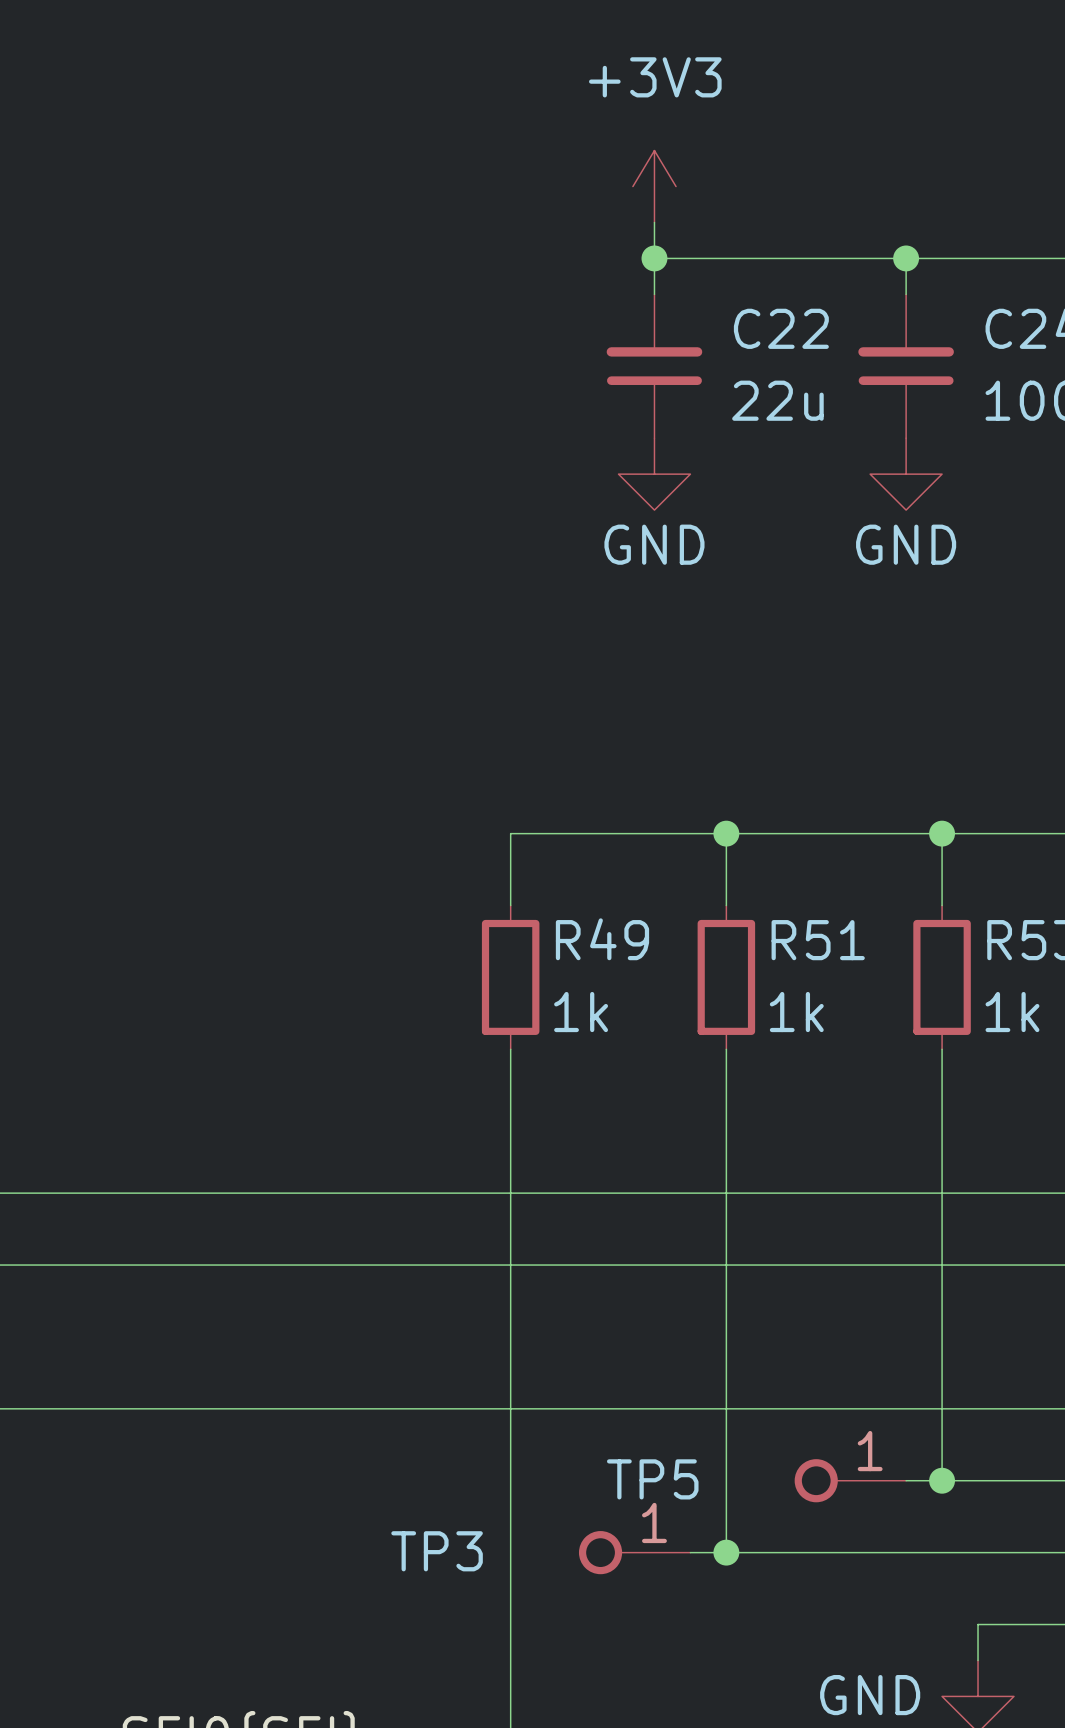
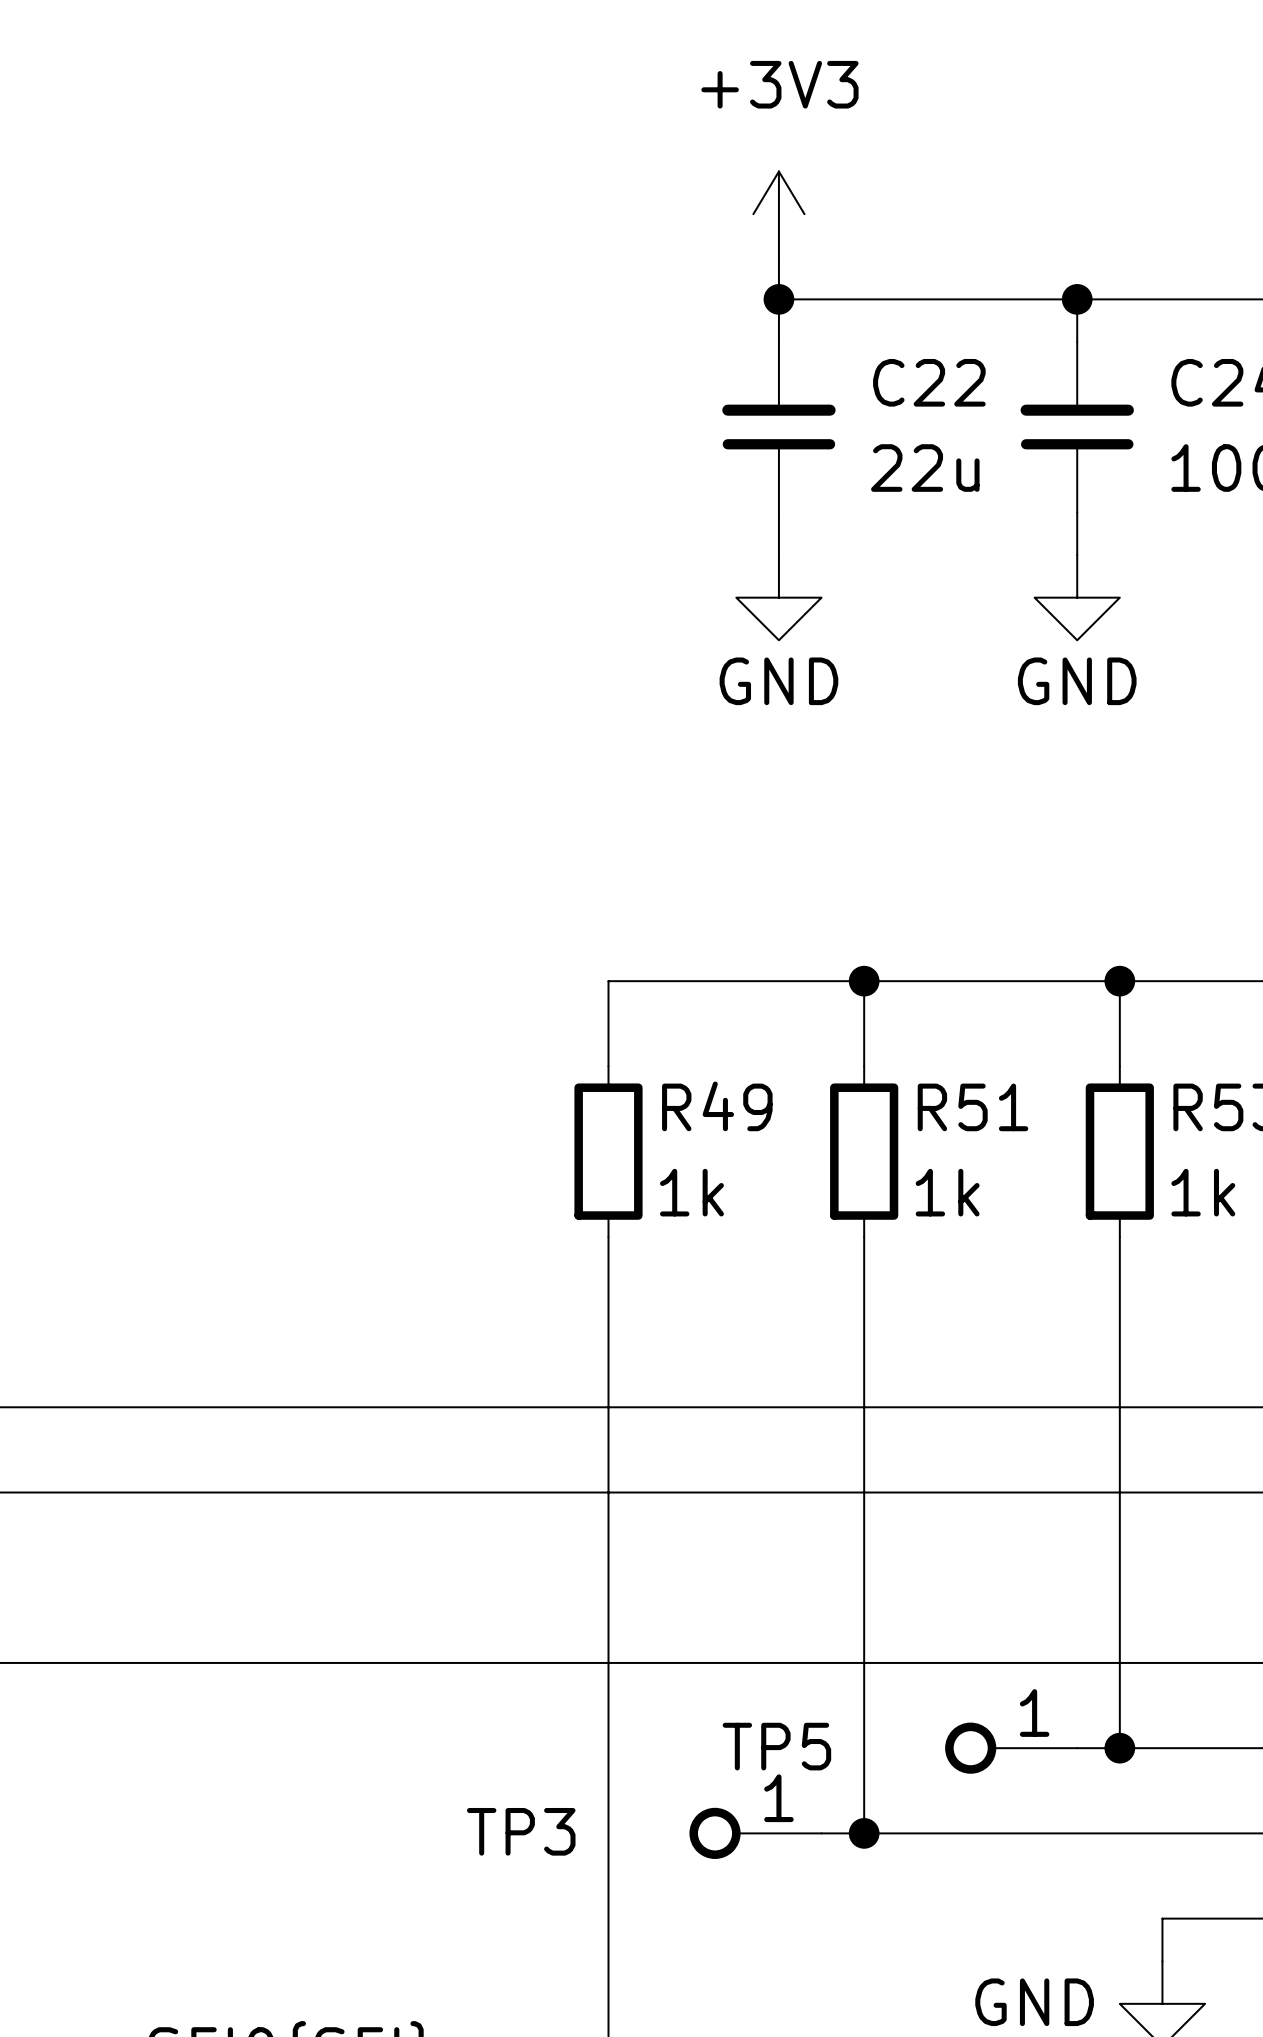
power symbol position: GND (654, 474) -> GND (778, 597)
power symbol position: GND (906, 474) -> GND (1077, 597)

